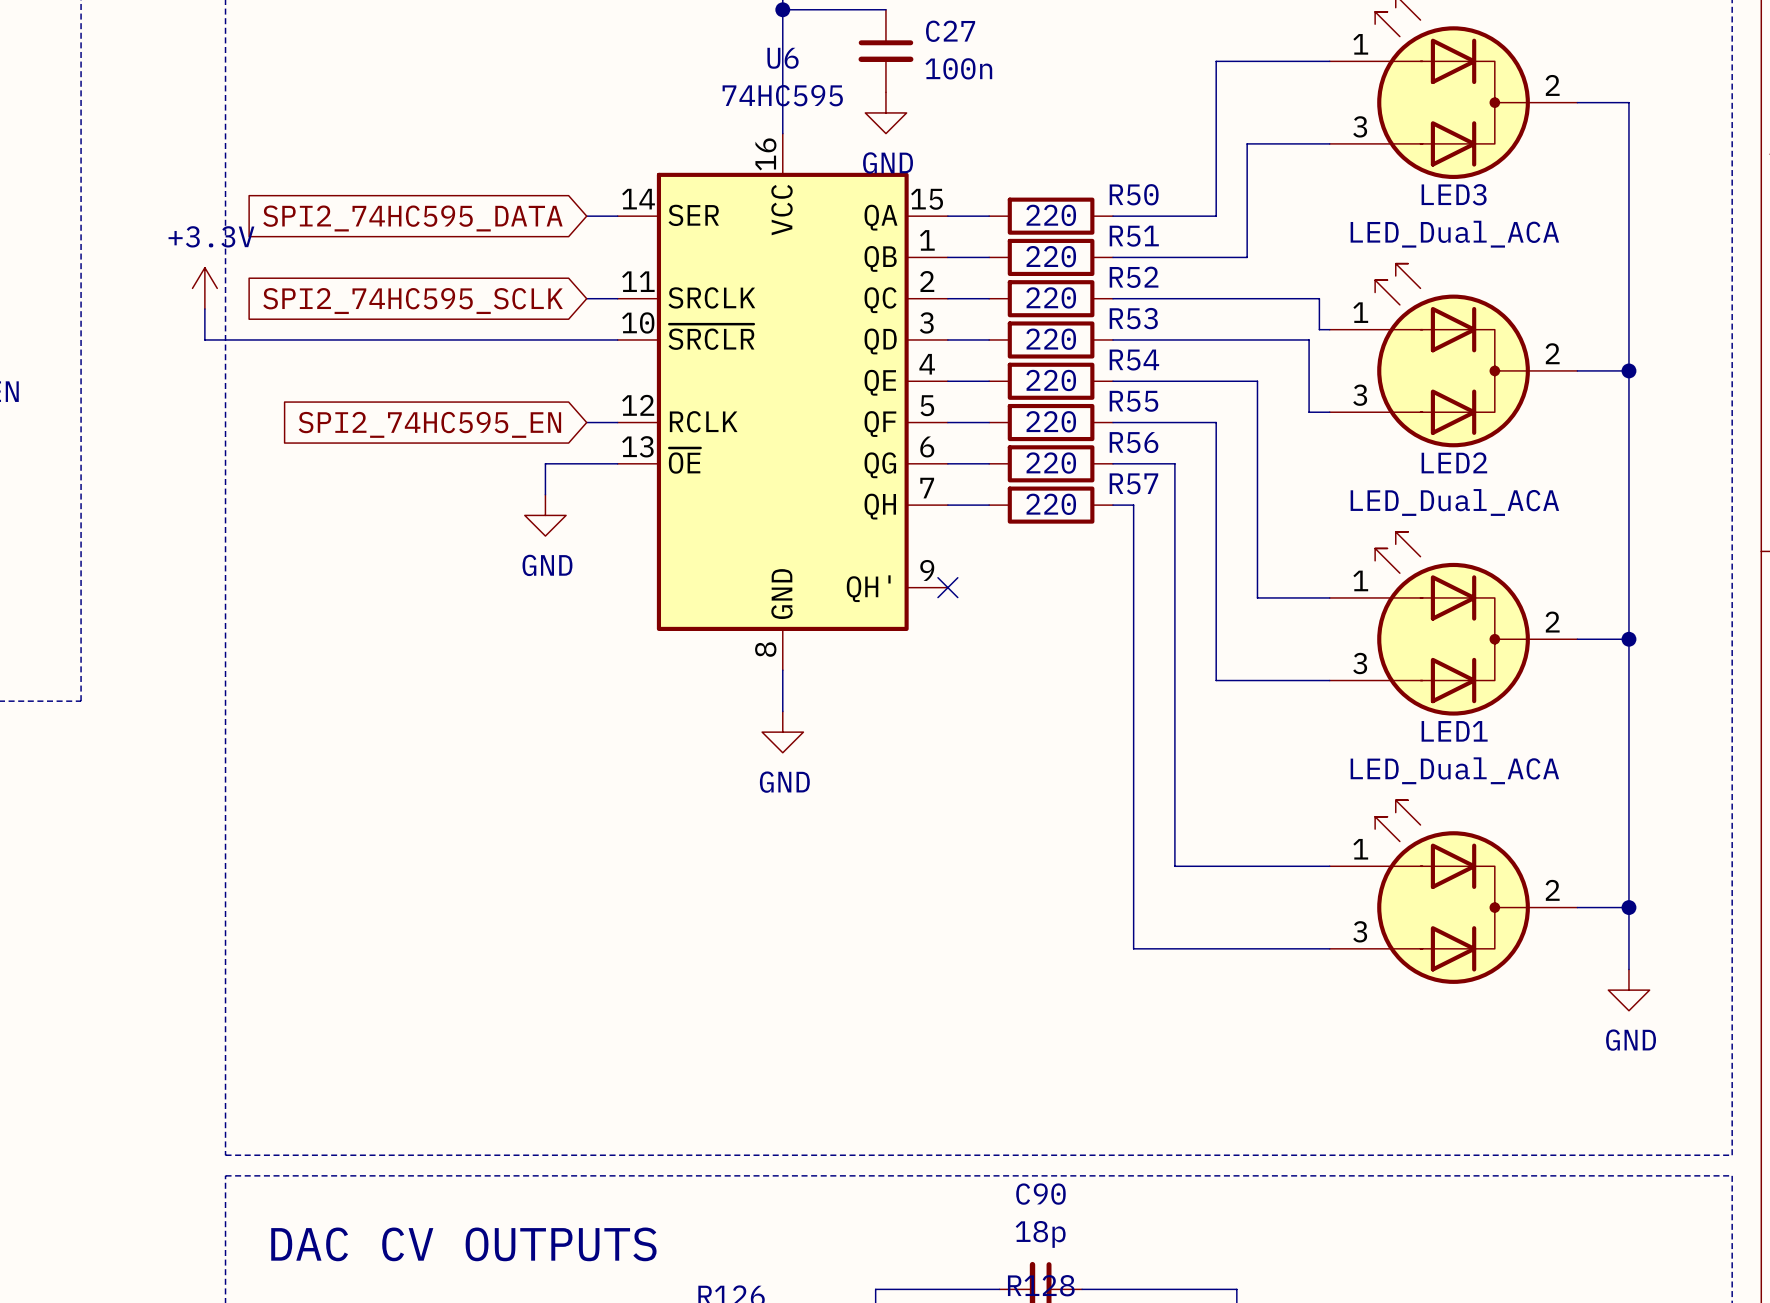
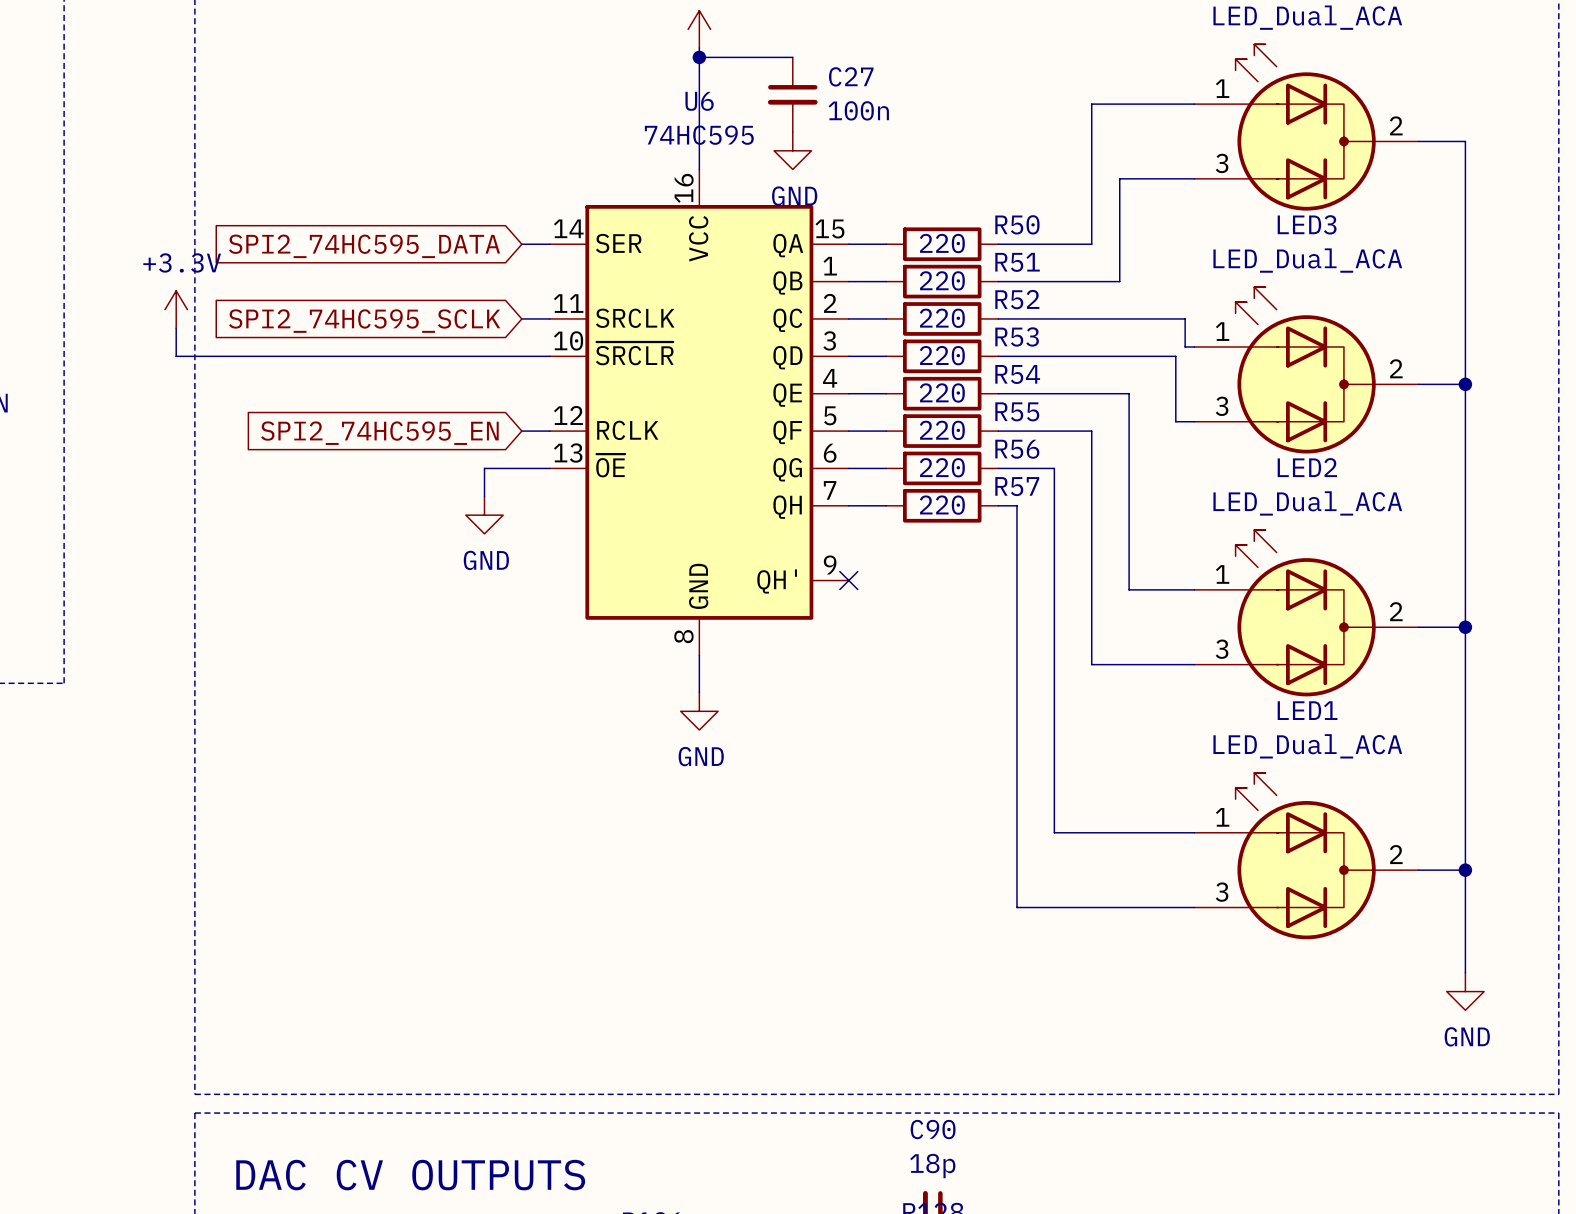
wire: none -> (1465, 926) (1465, 972)
power symbol position: GND (1628, 990) -> GND (1465, 991)

